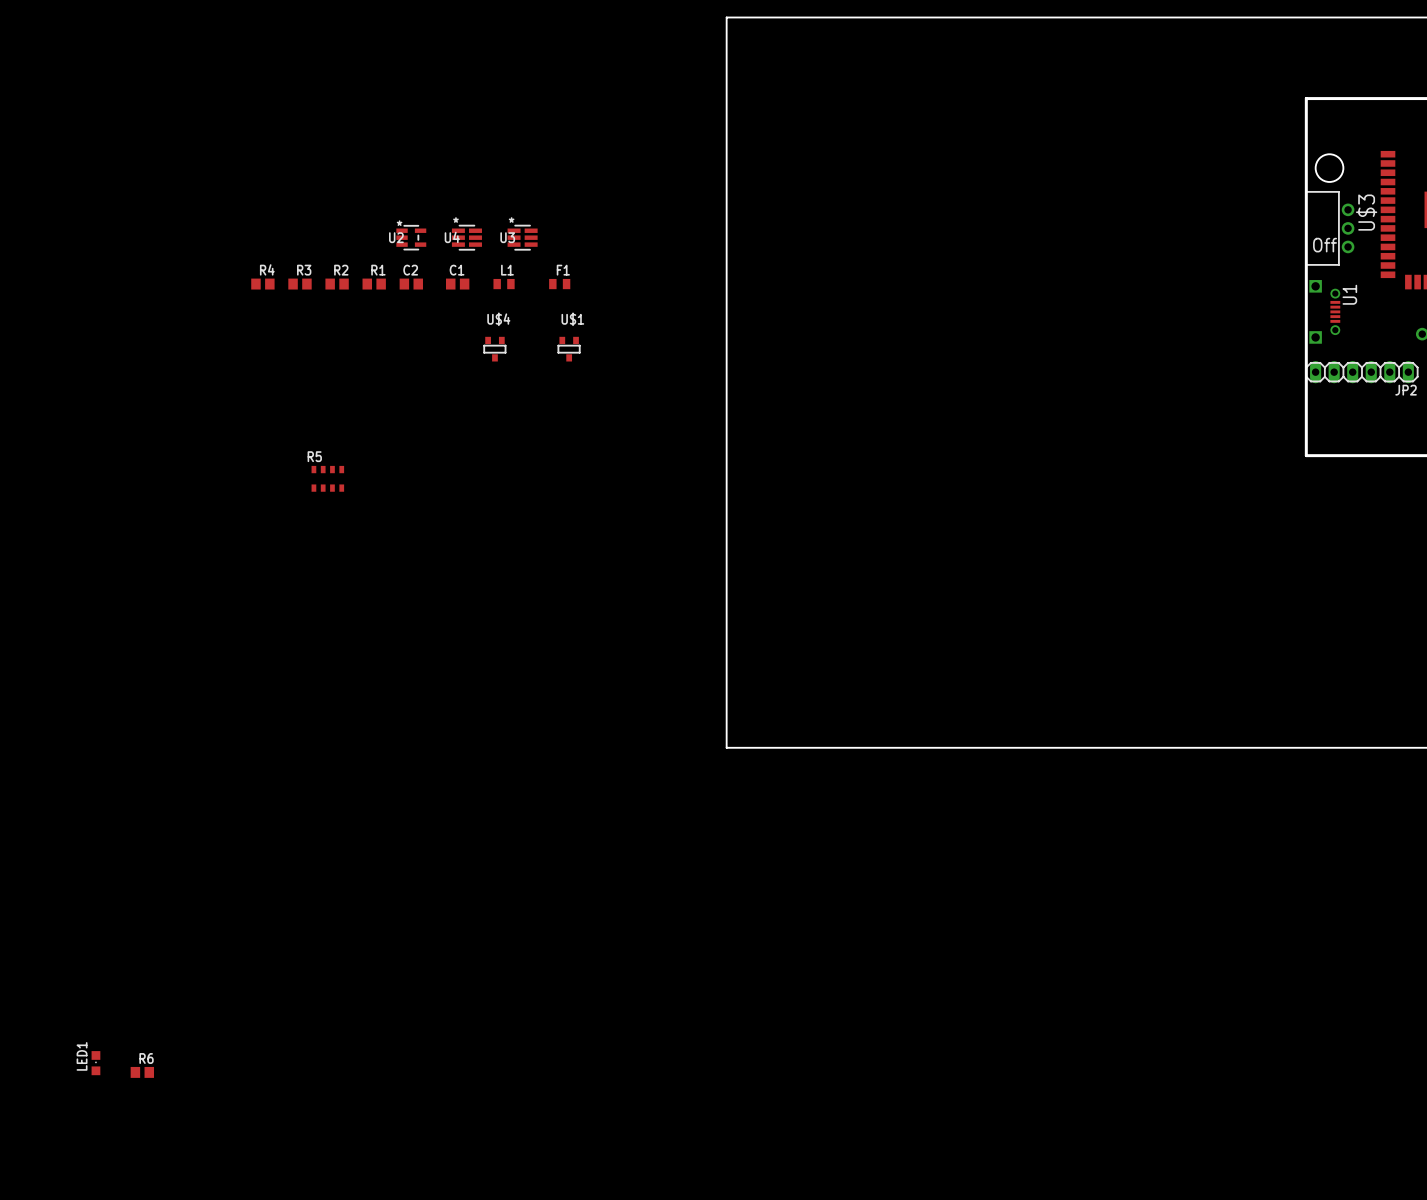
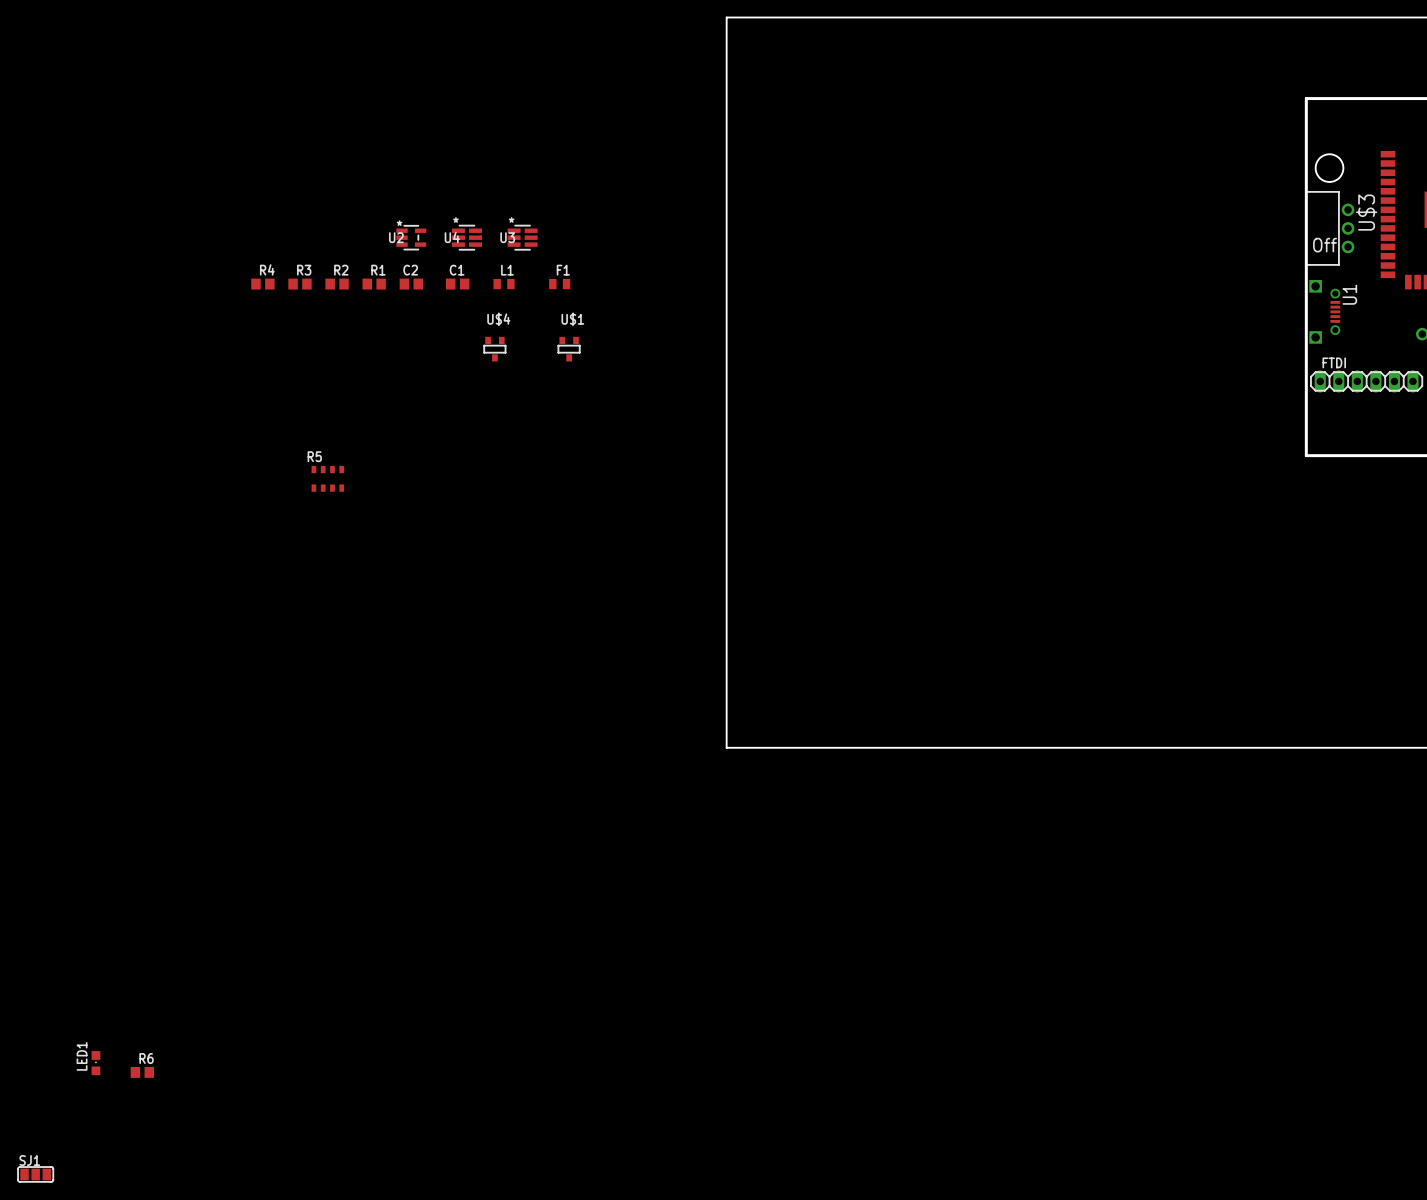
JP2: (1361, 372) -> none
part: none -> FTDI (1366, 381)
SJ1: none -> (35, 1174)

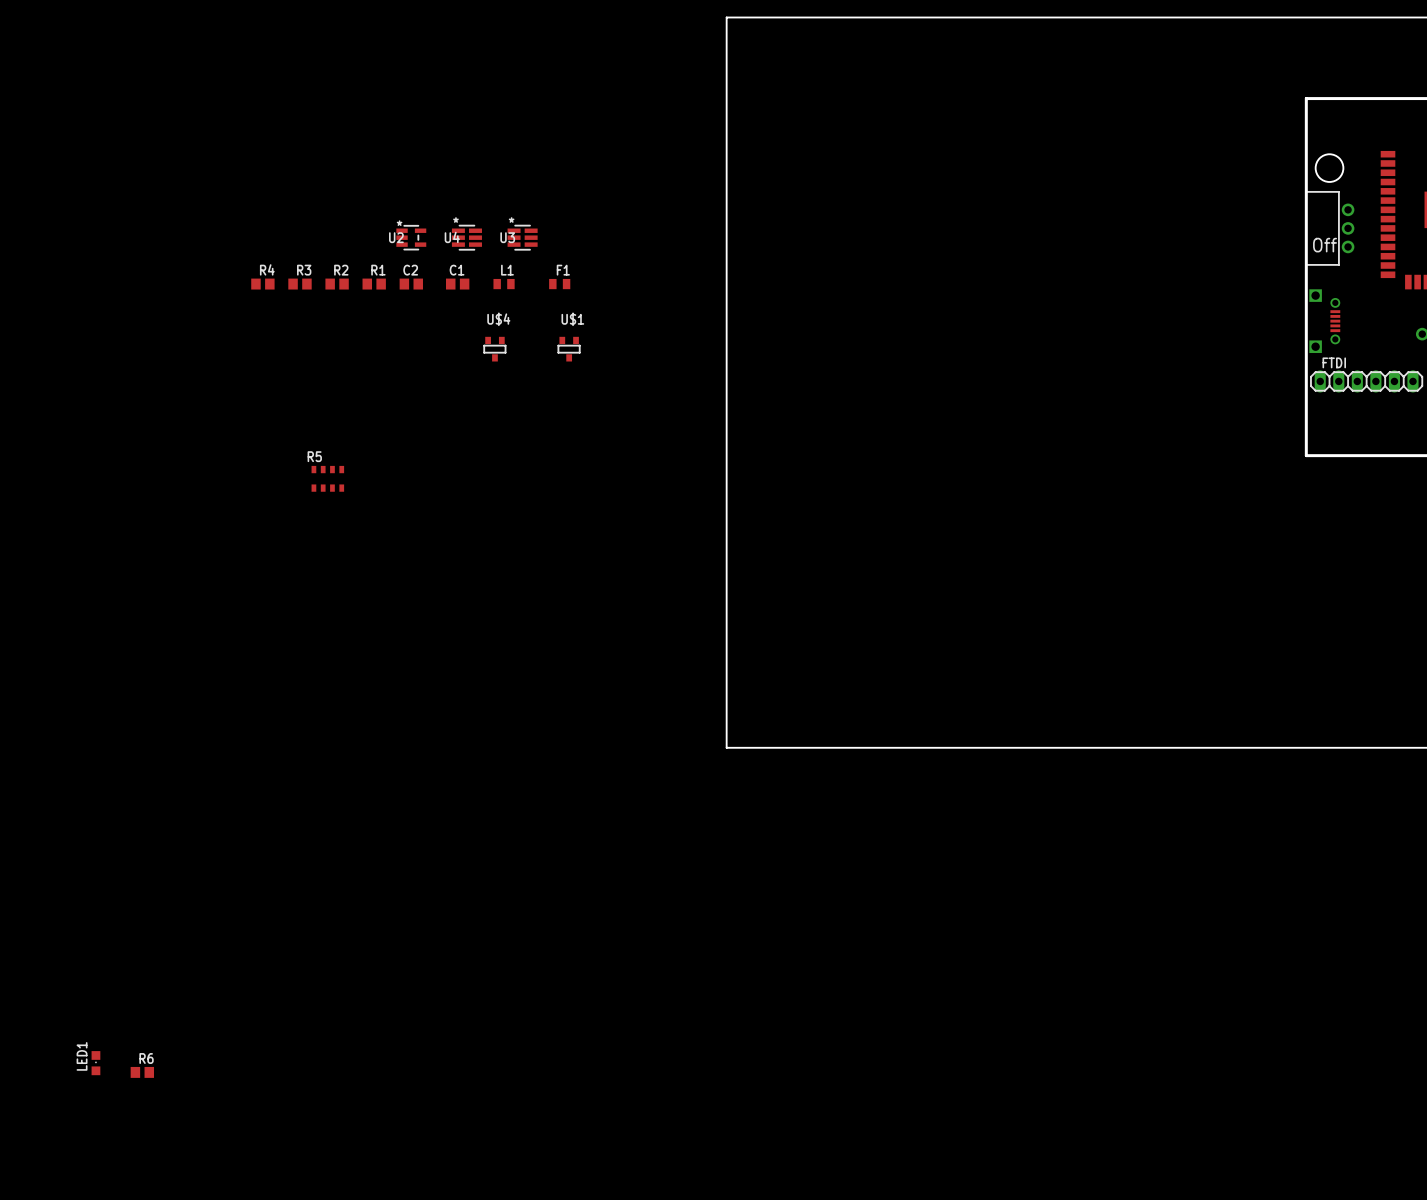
U$3 name: U$3 (1366, 212) -> none
U1: (1324, 311) -> none
part: none -> (1324, 321)
SJ1: (35, 1174) -> none

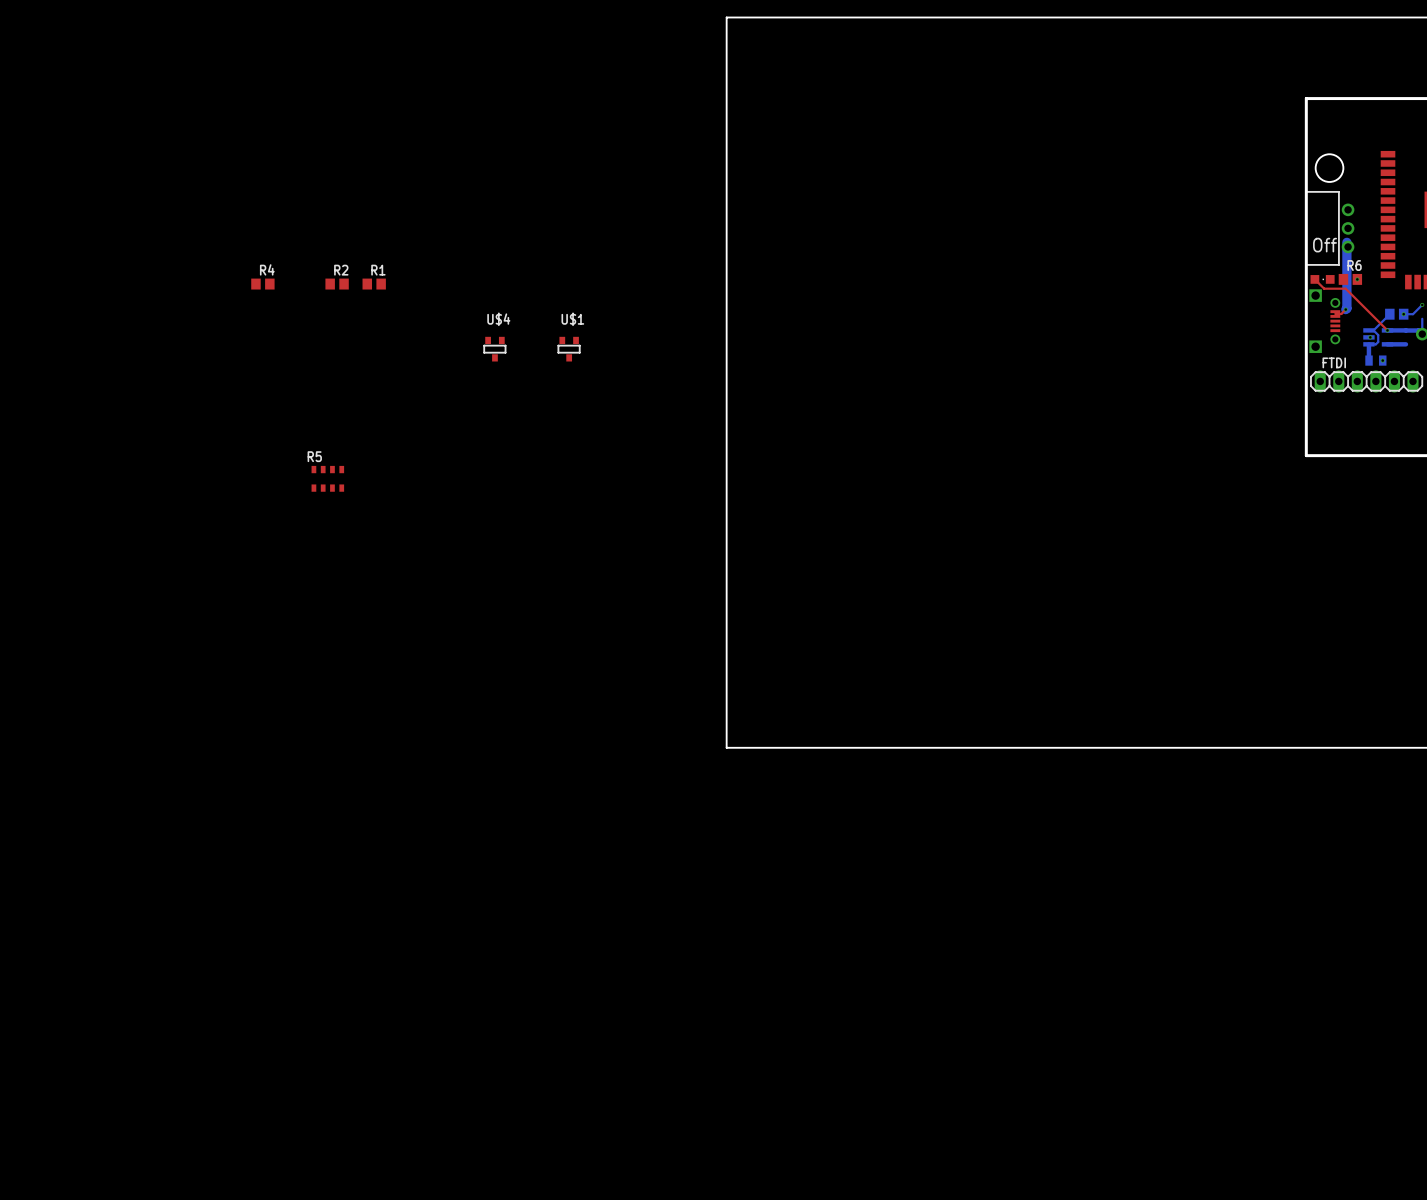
U2: (411, 237) -> none
U4: (466, 237) -> none
U3: (522, 237) -> none
bottom track: none -> (1346, 242) (1345, 309)
top track: none -> (1314, 279) (1324, 288) (1345, 288) (1387, 330)
part: none -> (1322, 279)
via: none -> (1357, 279)
R3: (300, 284) -> none
C2: (411, 284) -> none
C1: (457, 284) -> none
L1: (504, 284) -> none
F1: (559, 284) -> none
bottom track: none -> (1422, 304) (1413, 314) (1403, 314)
via: none -> (1422, 304)
top track: none -> (1345, 309) (1341, 313) (1335, 313)
via: none -> (1345, 309)
bottom track: none -> (1389, 314) (1373, 330)
part: none -> (1396, 314)
via: none -> (1403, 314)
bottom track: none -> (1422, 318) (1422, 334) (1418, 330) (1406, 330)
bottom track: none -> (1373, 330) (1378, 335) (1378, 342) (1375, 344) (1368, 344) (1368, 360)
bottom track: none -> (1387, 330) (1405, 330)
via: none -> (1387, 330)
via: none -> (1370, 337)
part: none -> (1378, 337)
bottom track: none -> (1387, 344) (1405, 344)
part: none -> (1375, 360)
via: none -> (1382, 360)
LED1: (95, 1063) -> none
R6 position: (142, 1072) -> (1350, 279)

